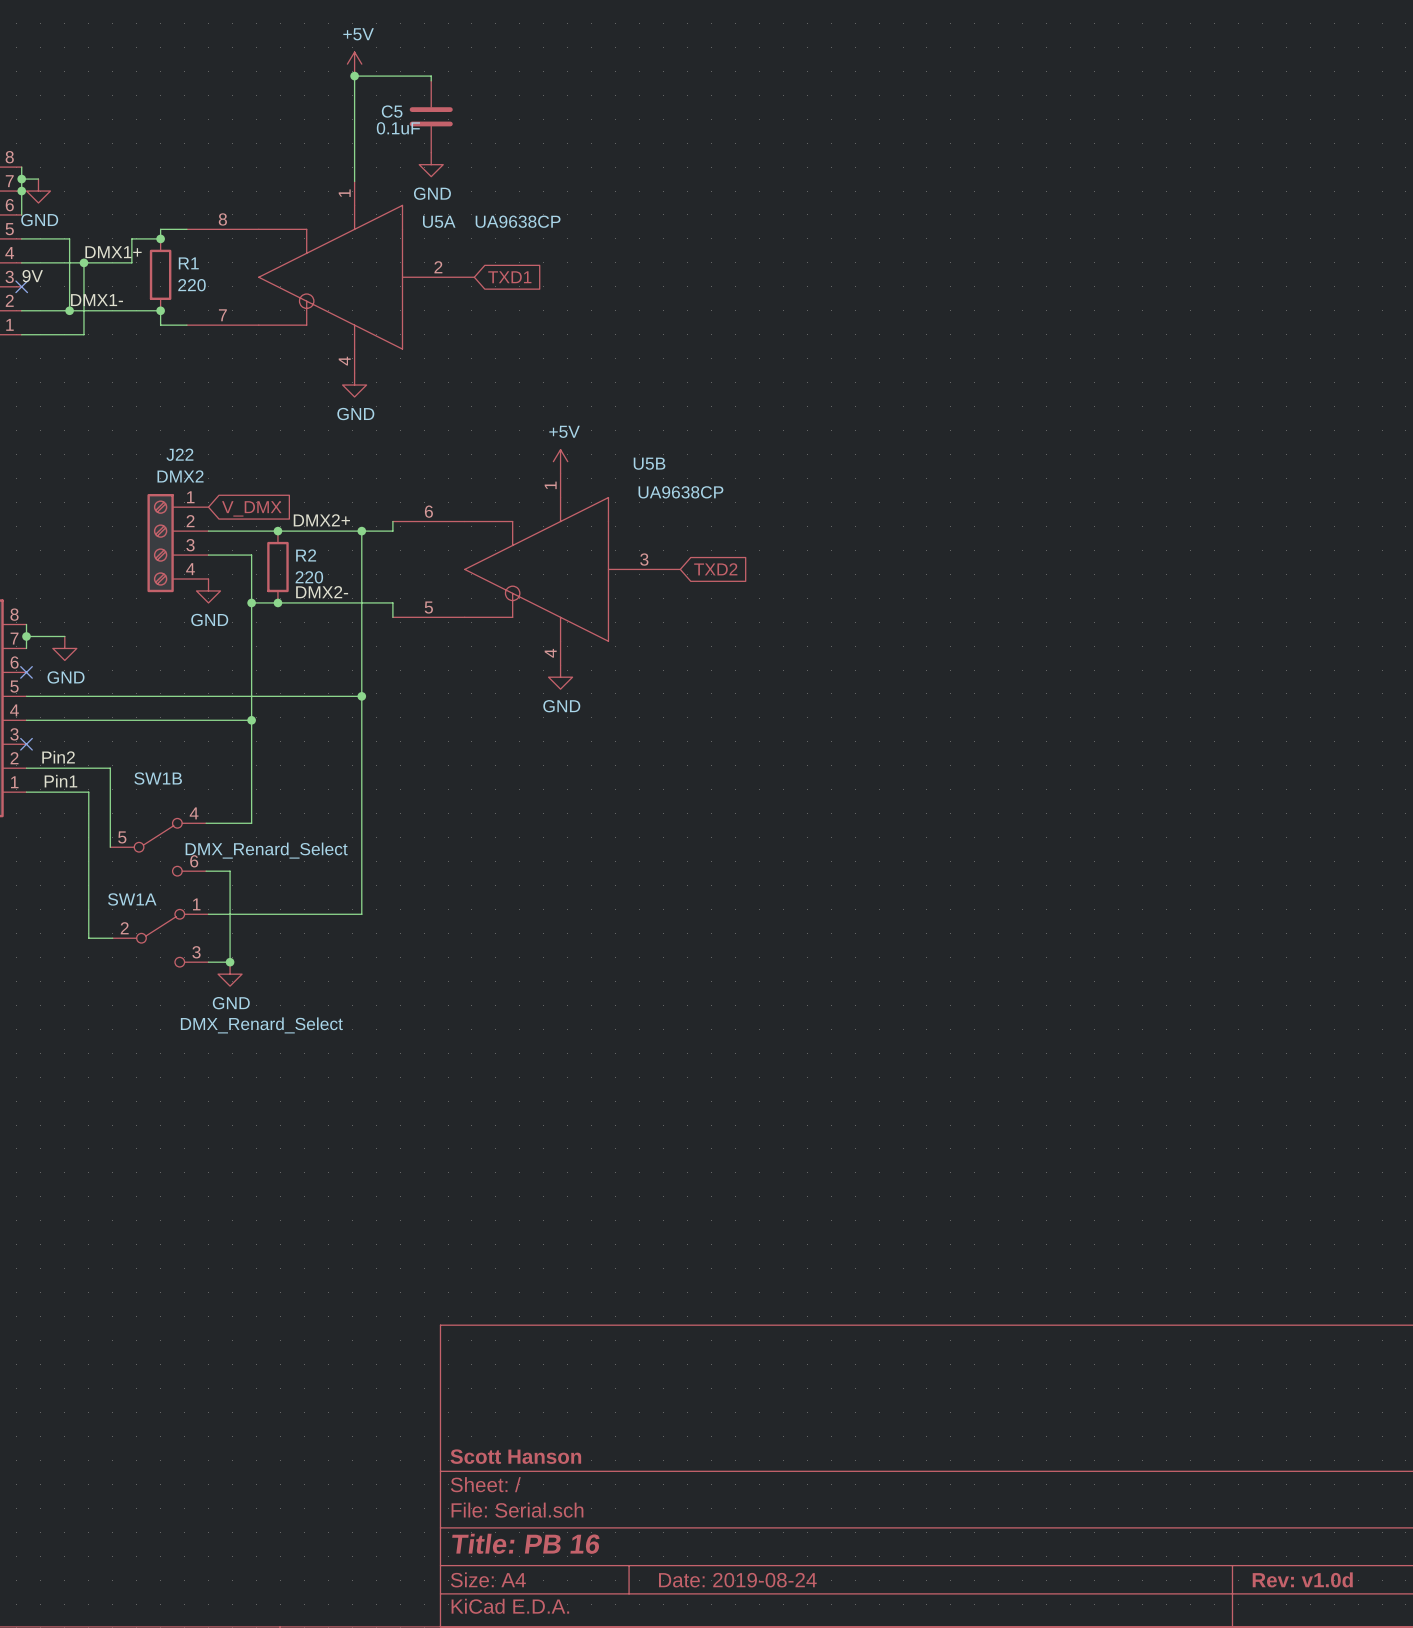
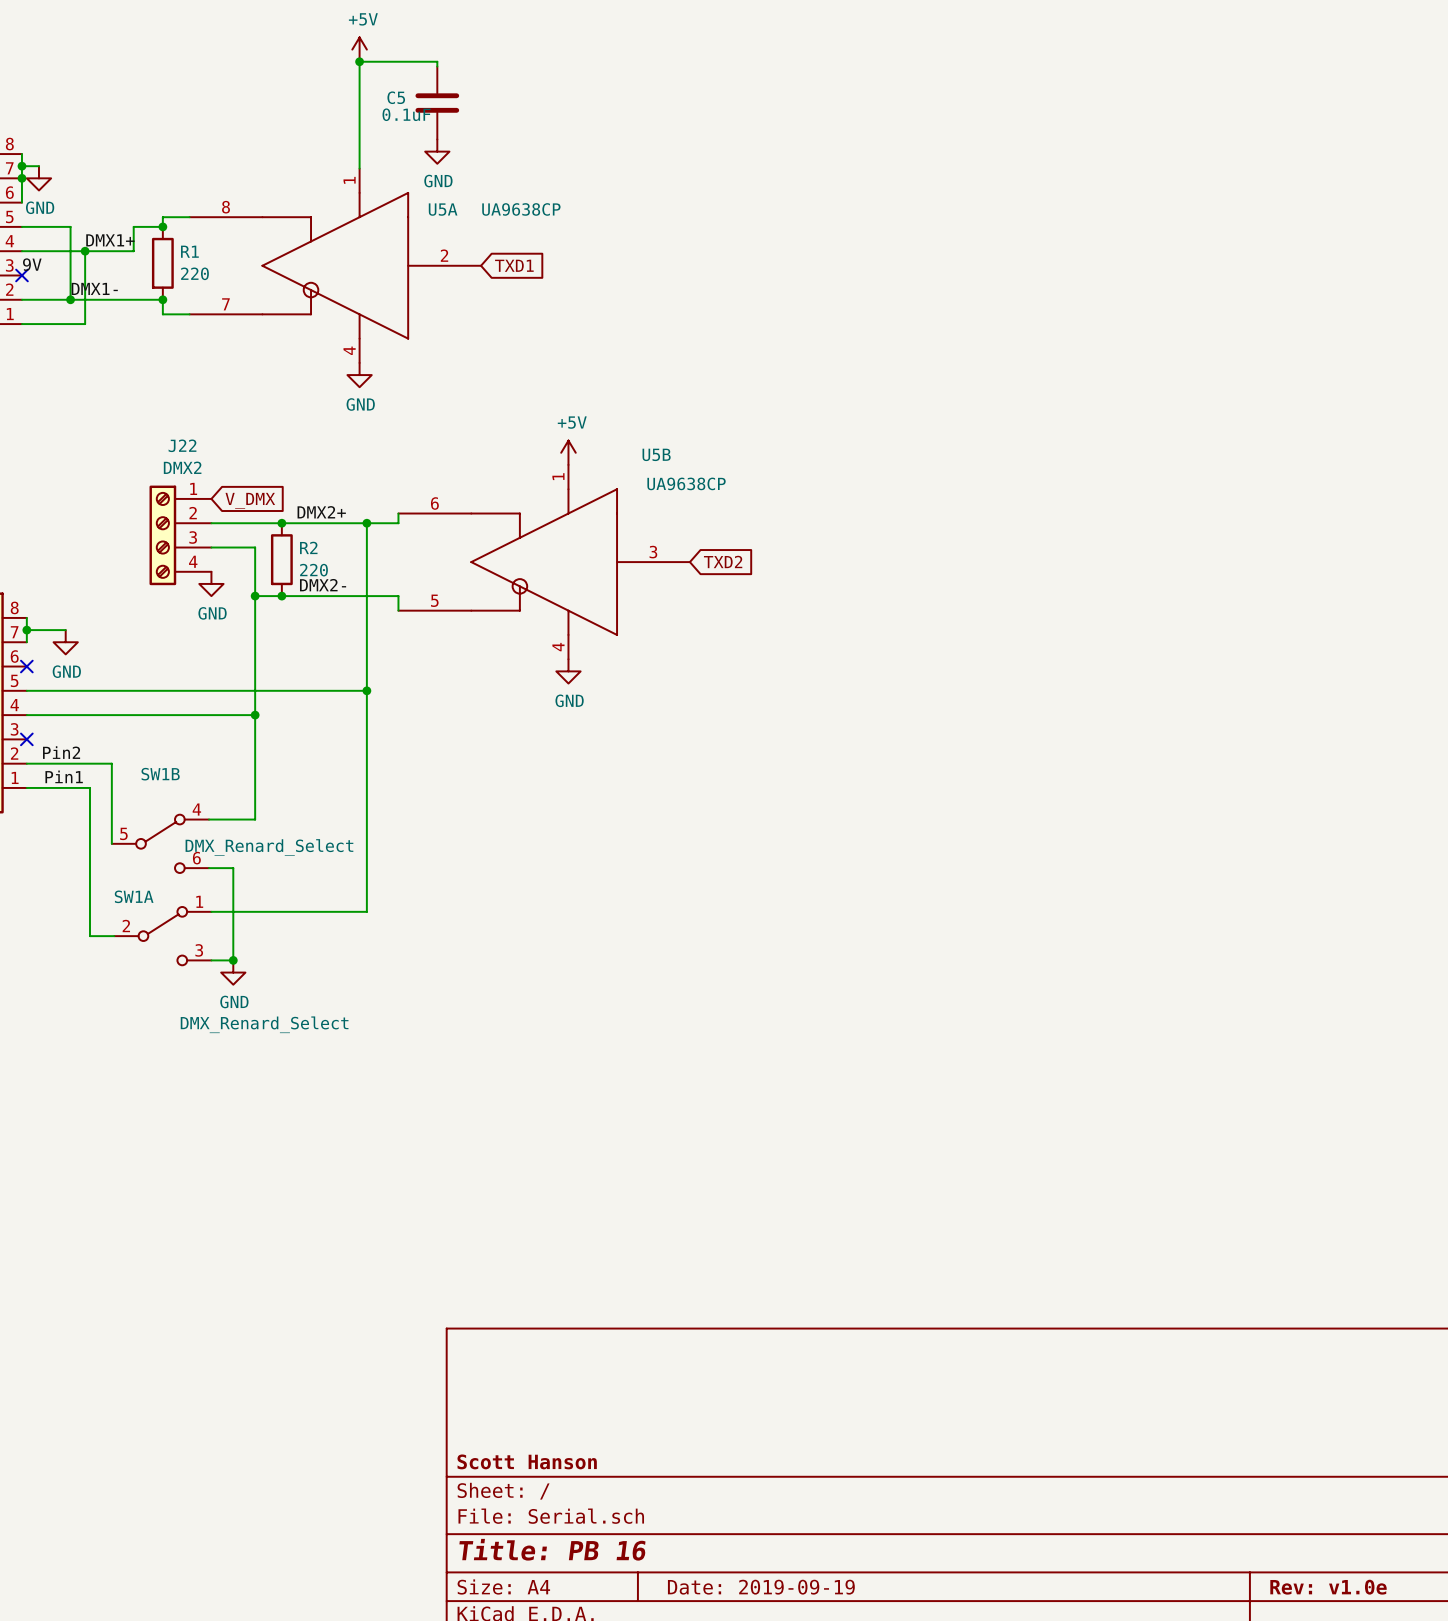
title block: Rev: v1.0d (1302, 1579) -> Rev: v1.0e (1328, 1587)
title block: Date: 2019-08-24 (737, 1580) -> Date: 2019-09-19 (761, 1587)

